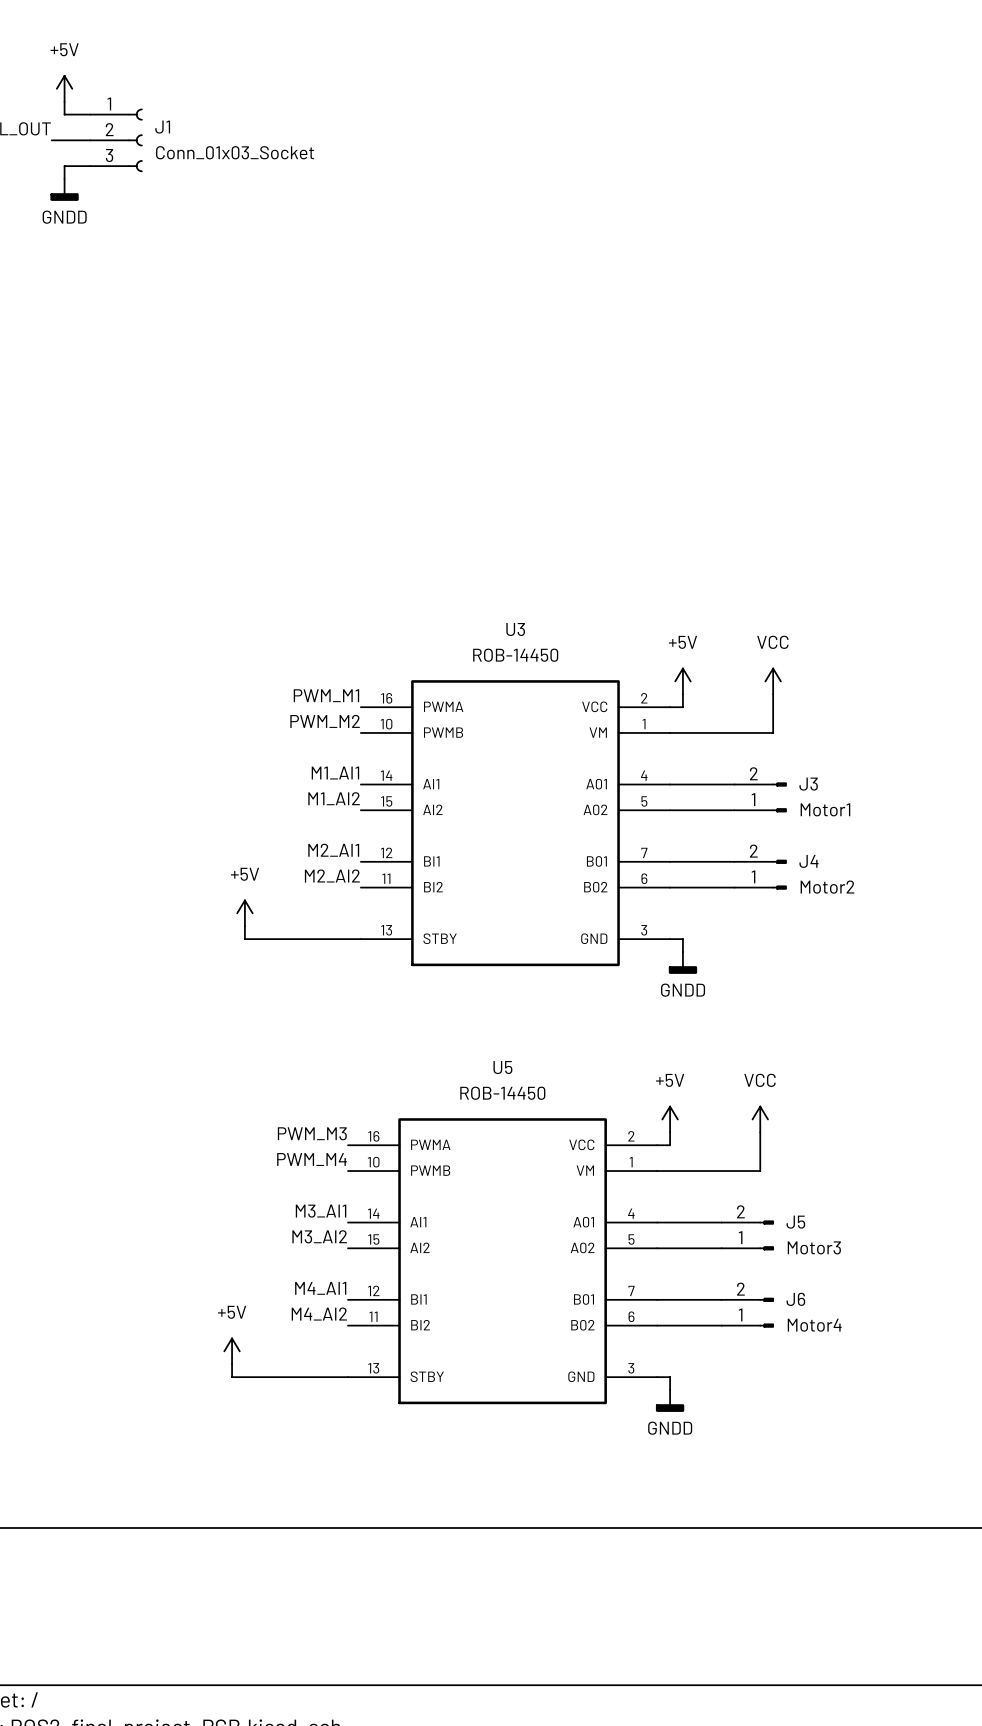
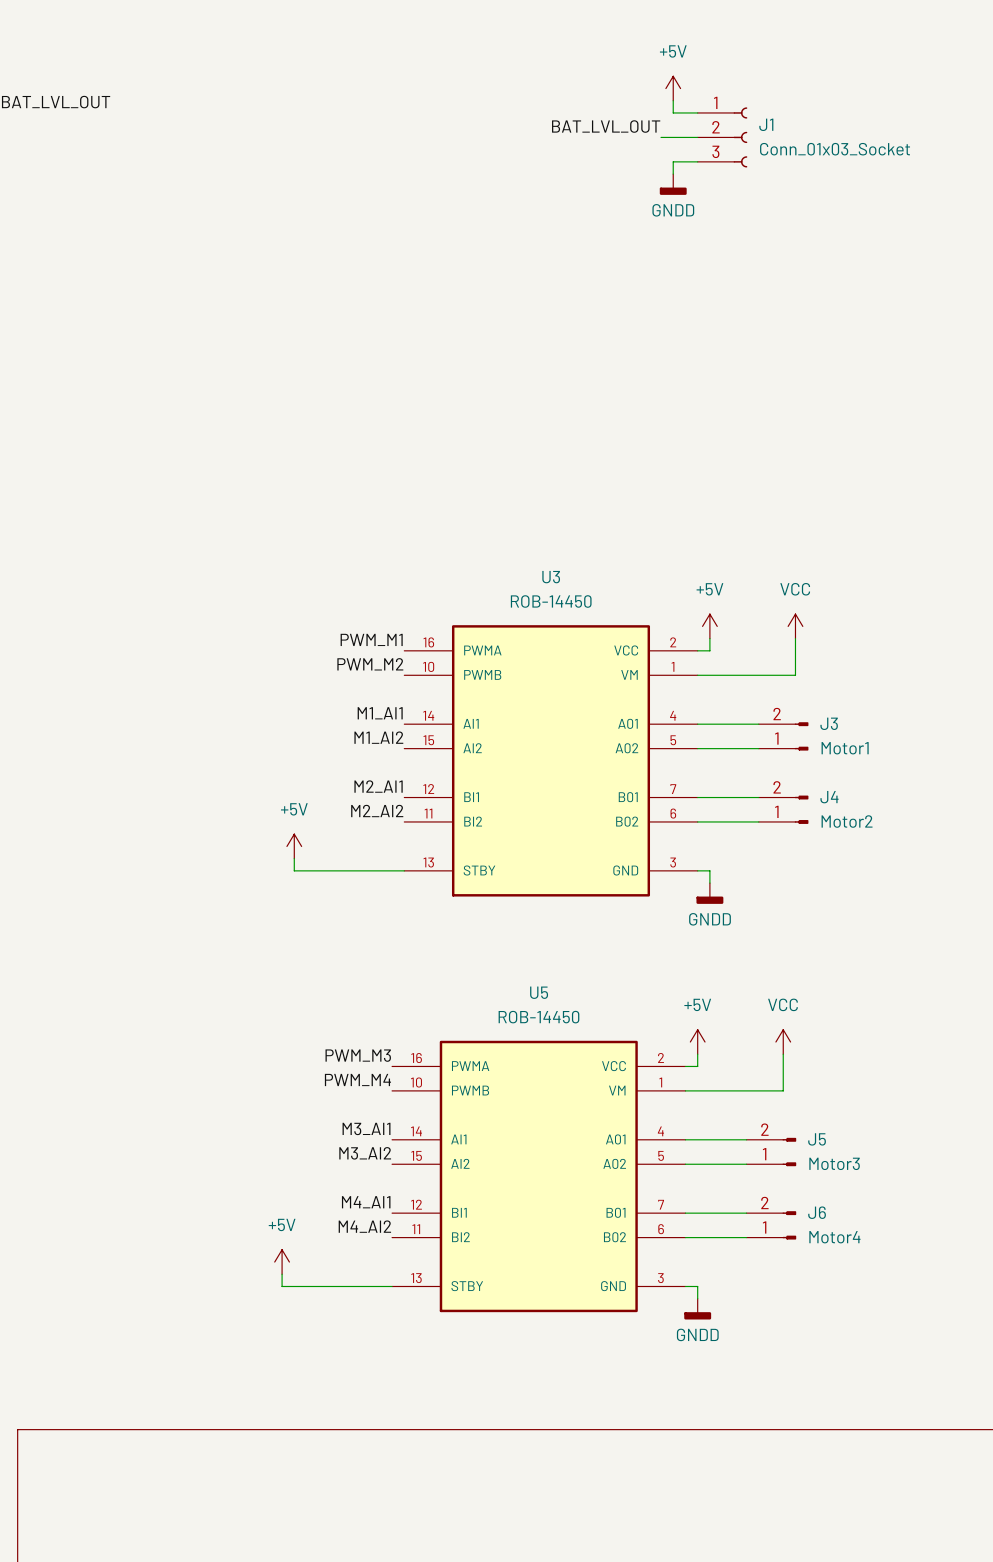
power symbol: +5V (64, 88) -> none
wire: (64, 101) (64, 114) (90, 114) -> none
power symbol: none -> +5V (673, 88)
wire: none -> (673, 100) (673, 112) (697, 112)
wire: (51, 140) (90, 140) -> none
J1 position: (116, 140) -> (722, 137)
label: none -> BAT_LVL_OUT (606, 126)
wire: (90, 166) (64, 166) (64, 178) -> none
wire: none -> (661, 137) (697, 137)
power symbol: GNDD (64, 189) -> none
wire: none -> (697, 161) (673, 161) (673, 174)
power symbol: none -> GNDD (673, 184)

